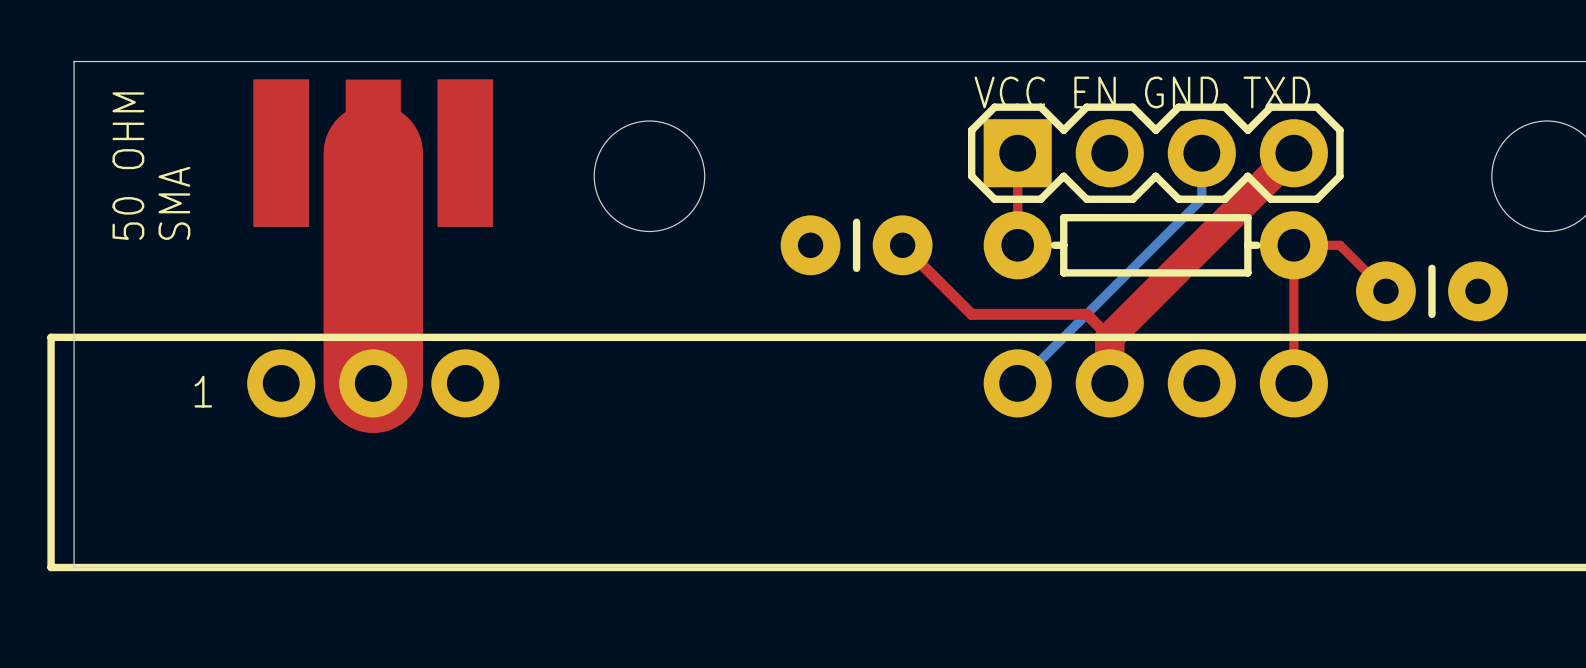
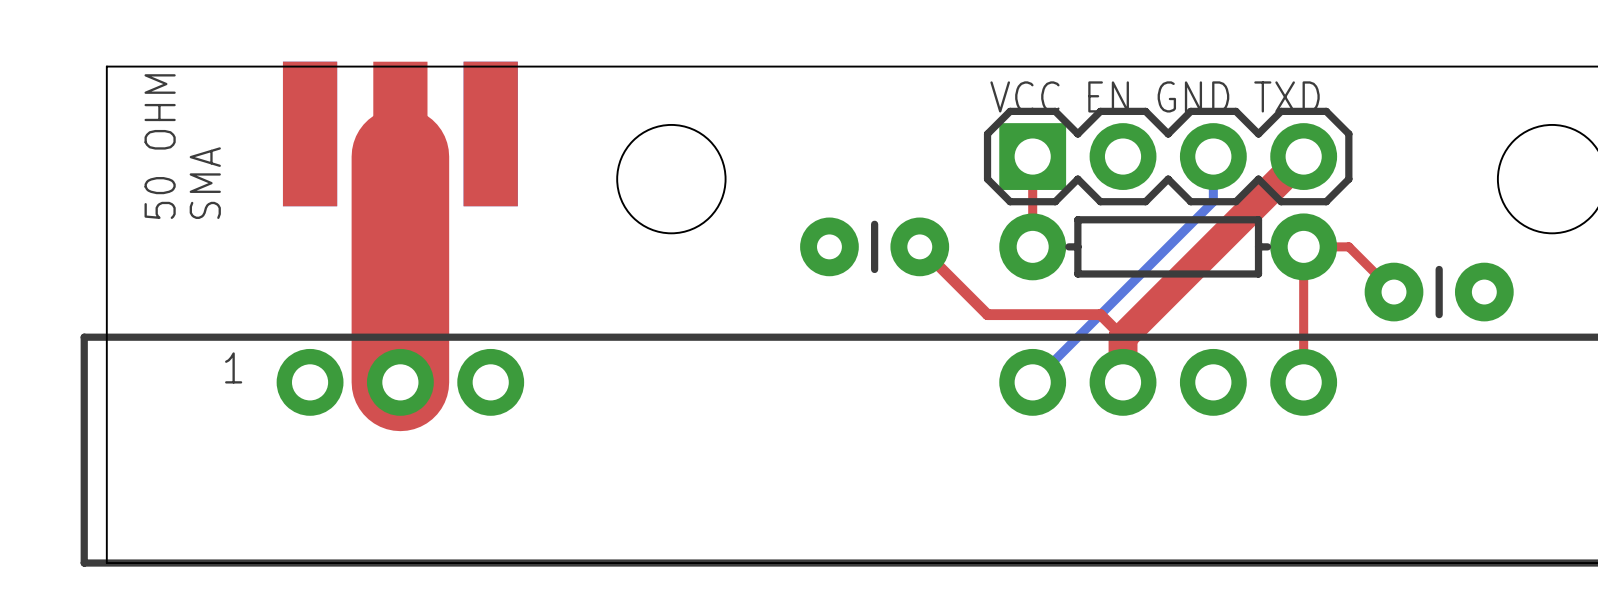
part position: (373, 153) -> (400, 133)
text position: 50 OHM (128, 166) -> 50 OHM (160, 146)
text position: SMA (174, 203) -> SMA (205, 183)
text position: 1 (203, 391) -> 1 (233, 367)

